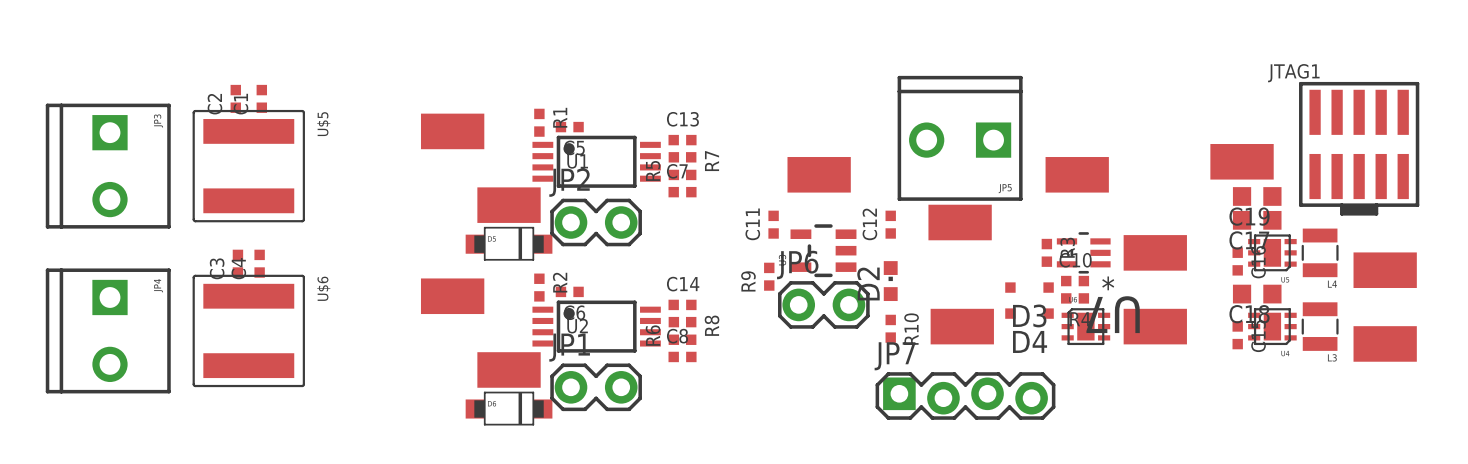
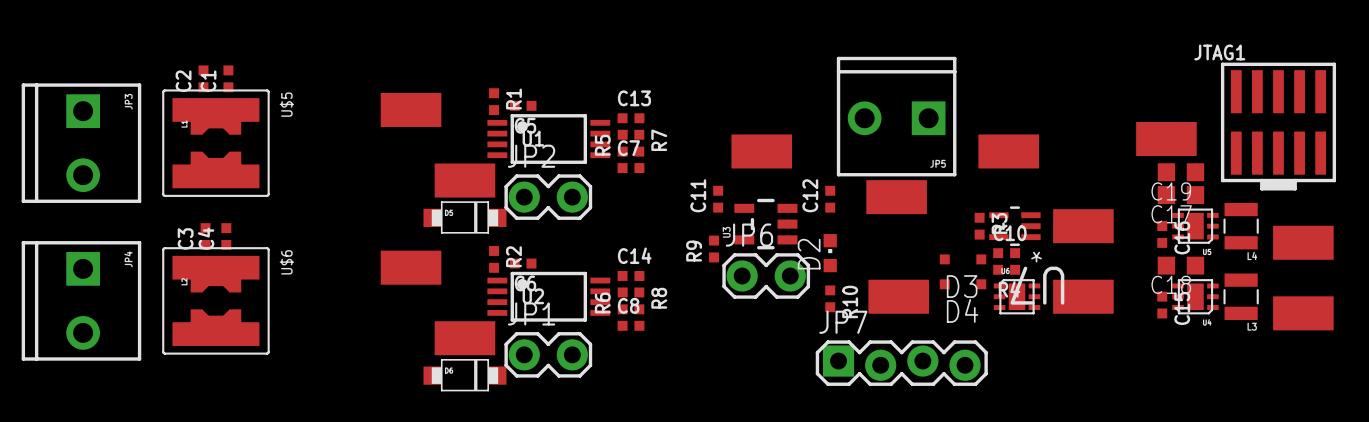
part: none -> (215, 143)
part: none -> (215, 300)

